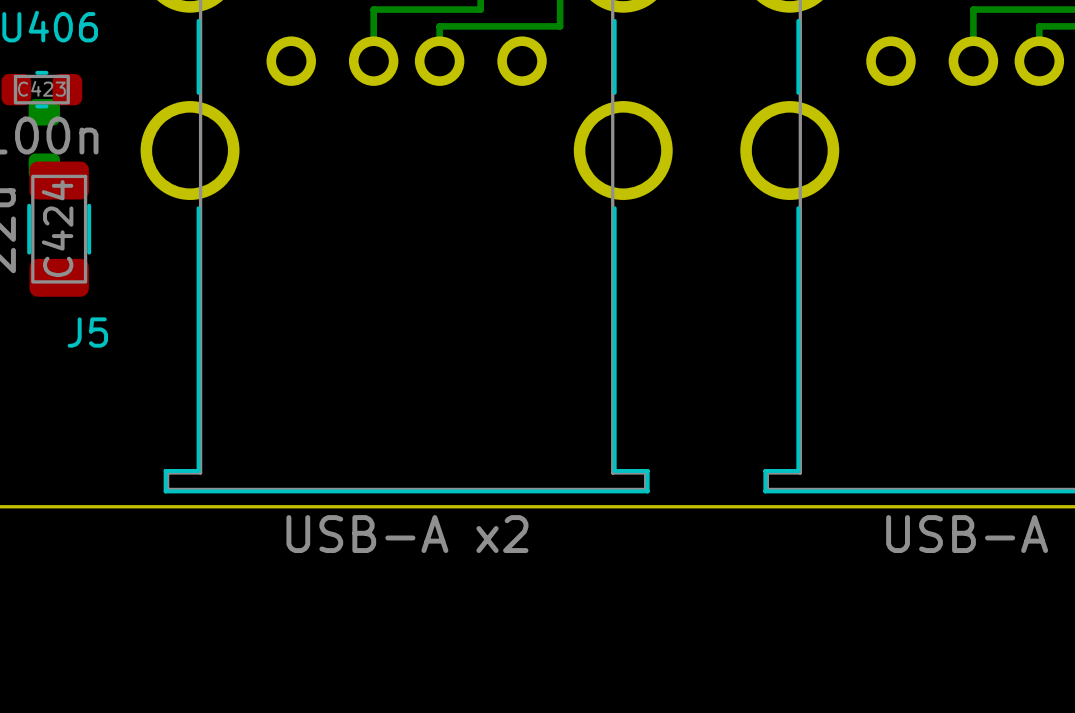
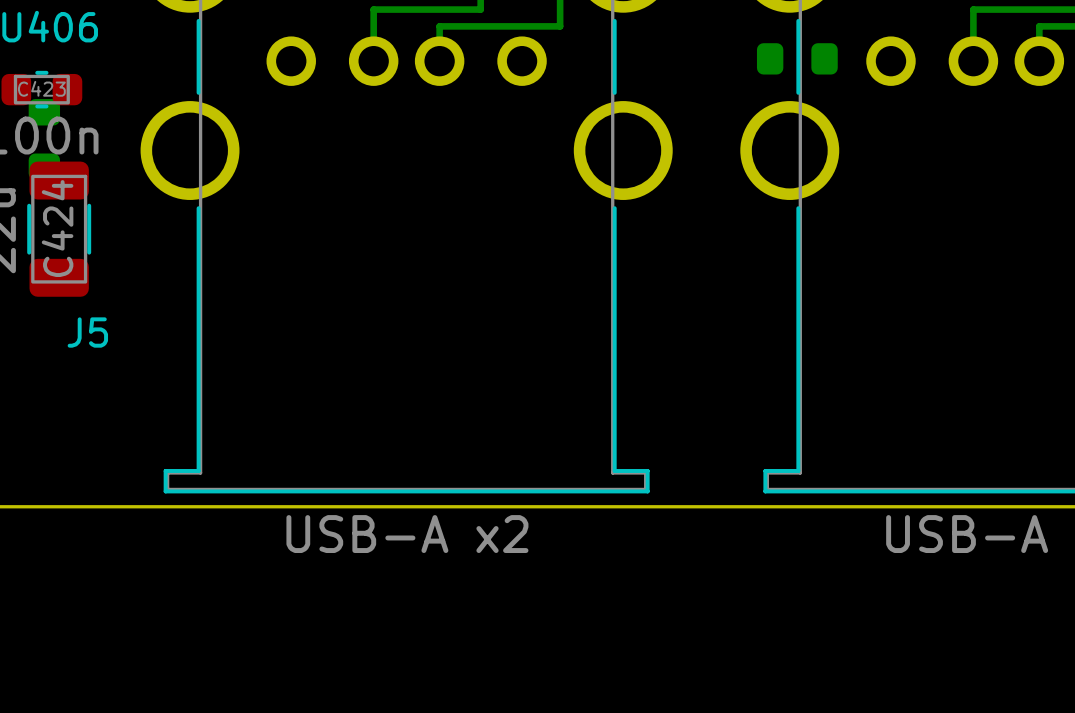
part: none -> (797, 58)

